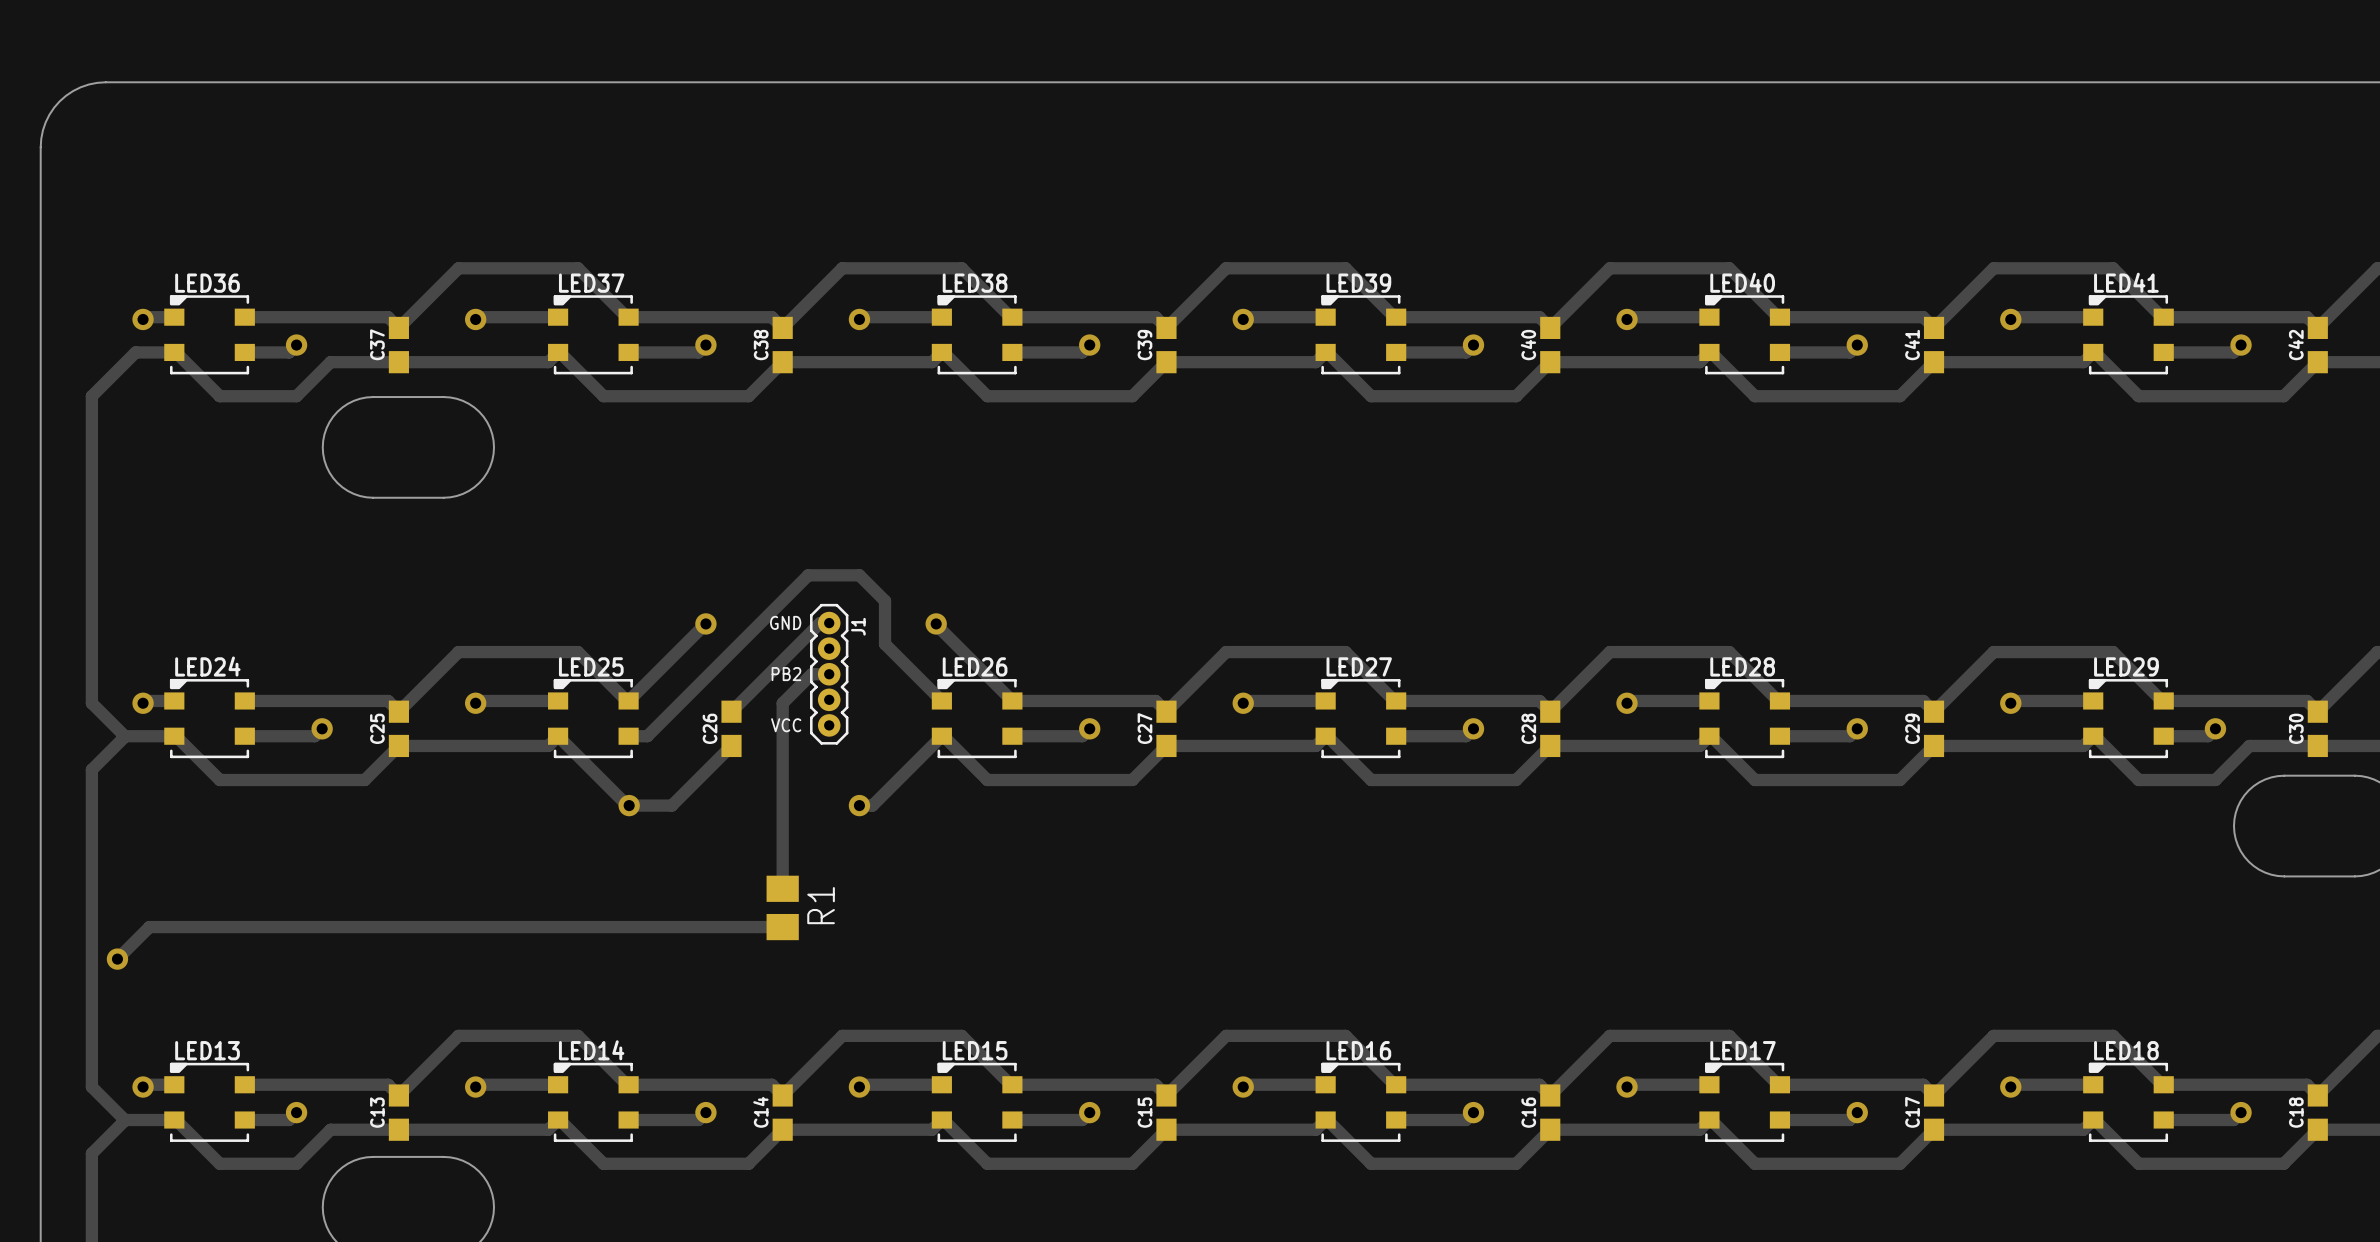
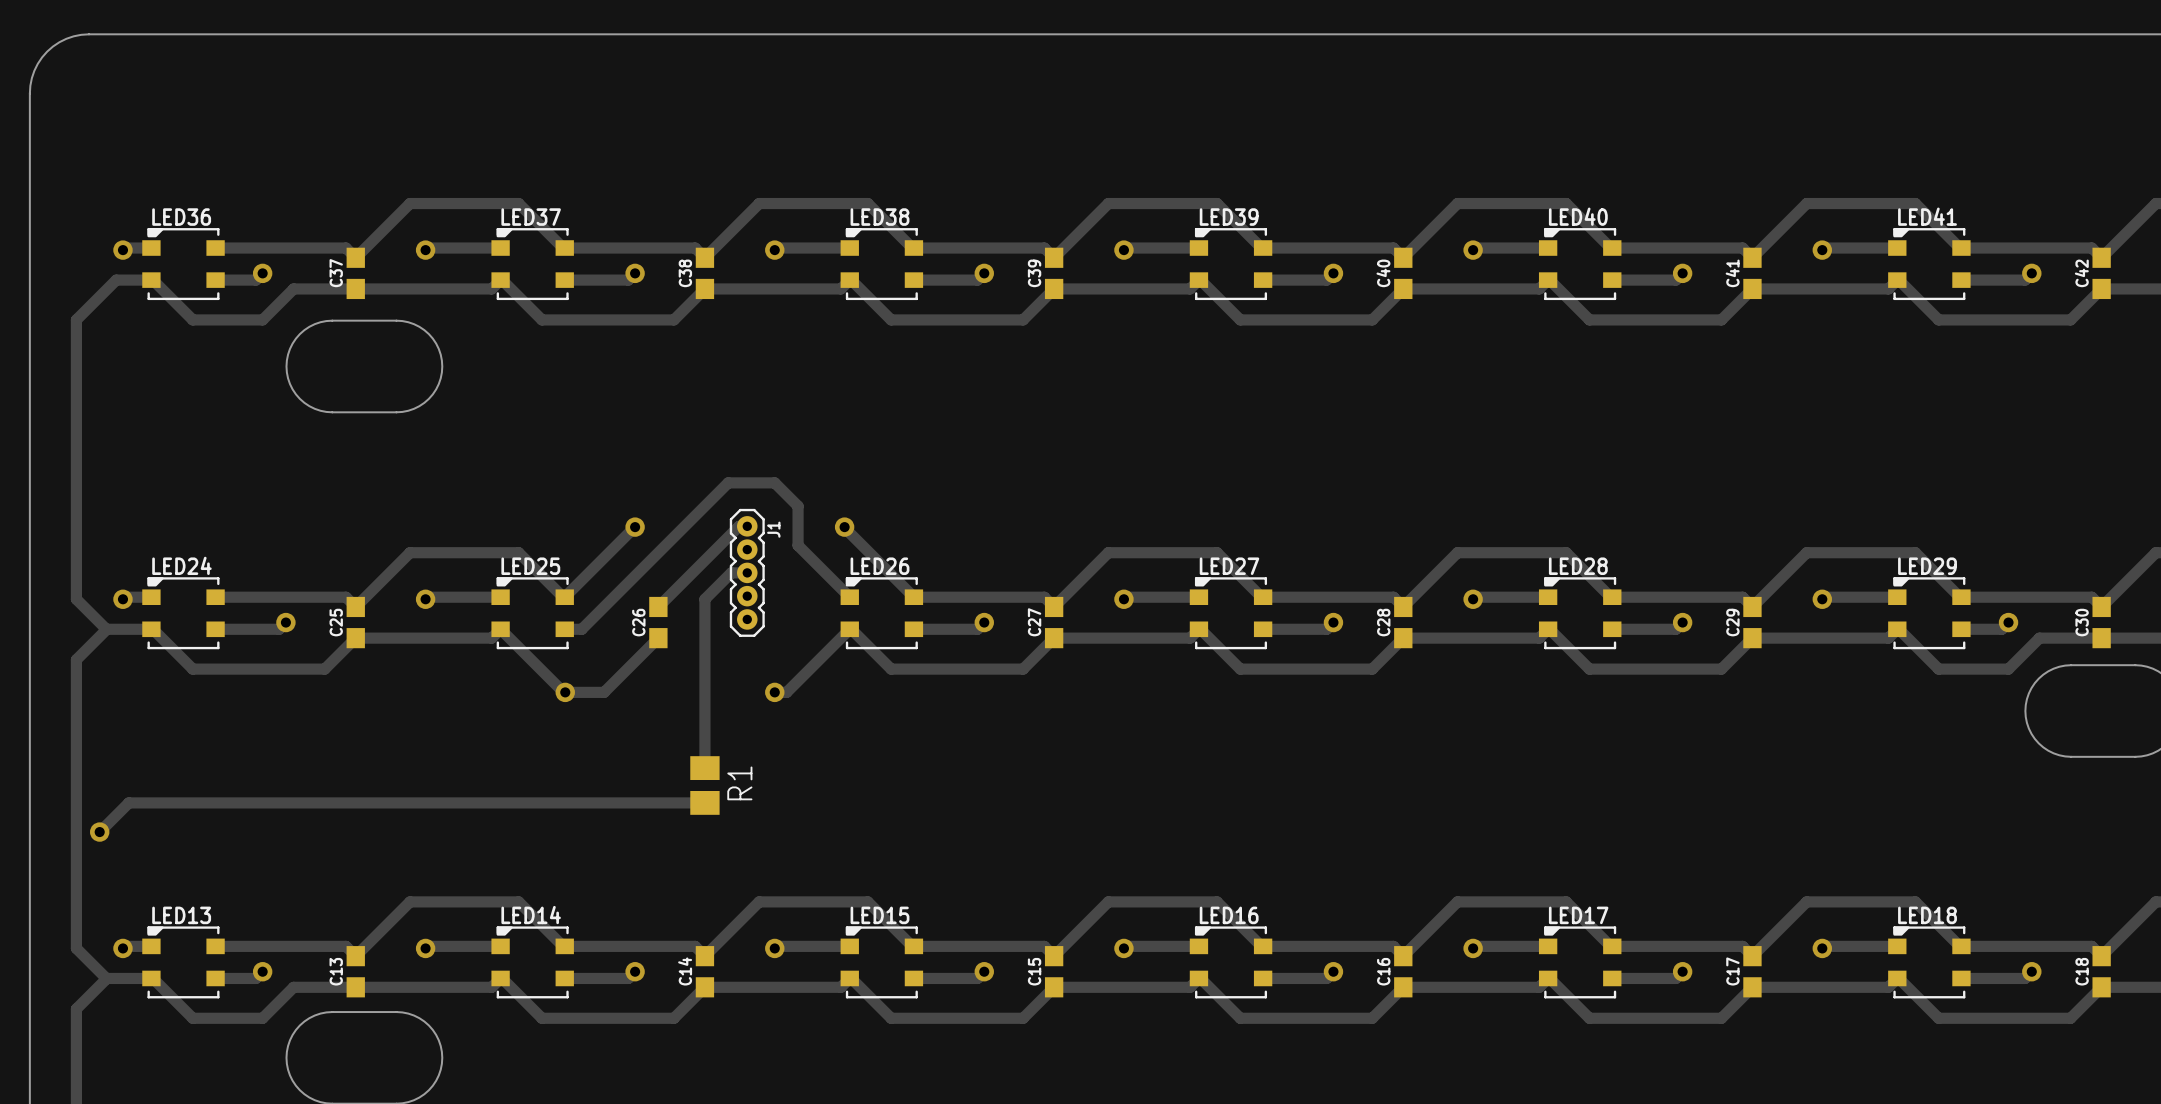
text: GND (785, 622) -> none
text: PB2 (786, 674) -> none
text: VCC (786, 725) -> none

